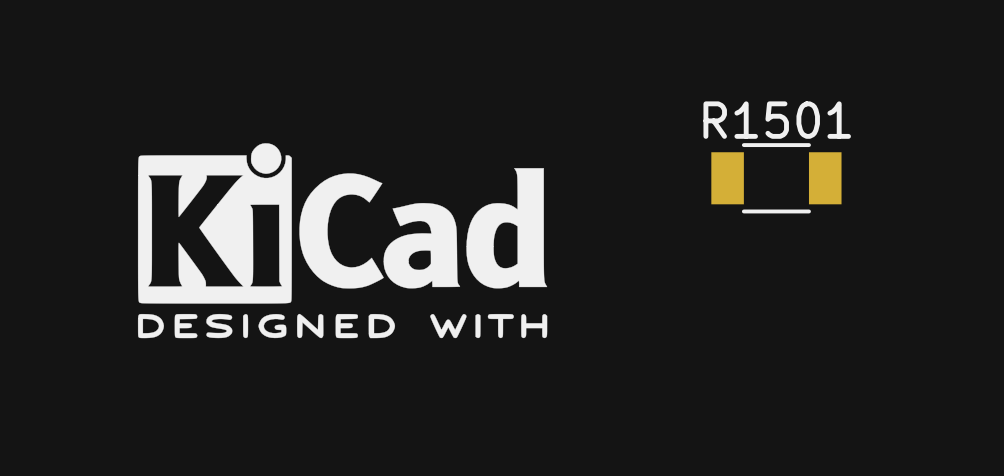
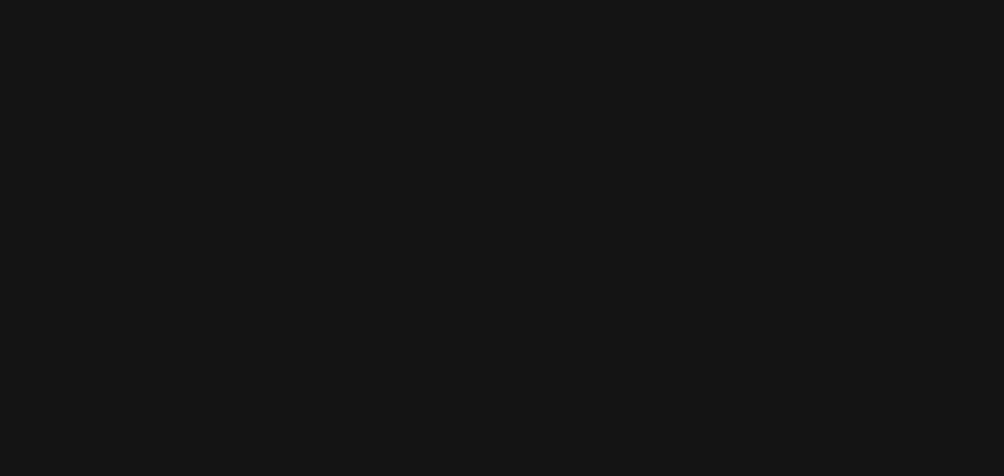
drawing: [137, 143, 548, 339] -> none
R1501: (776, 178) -> none

